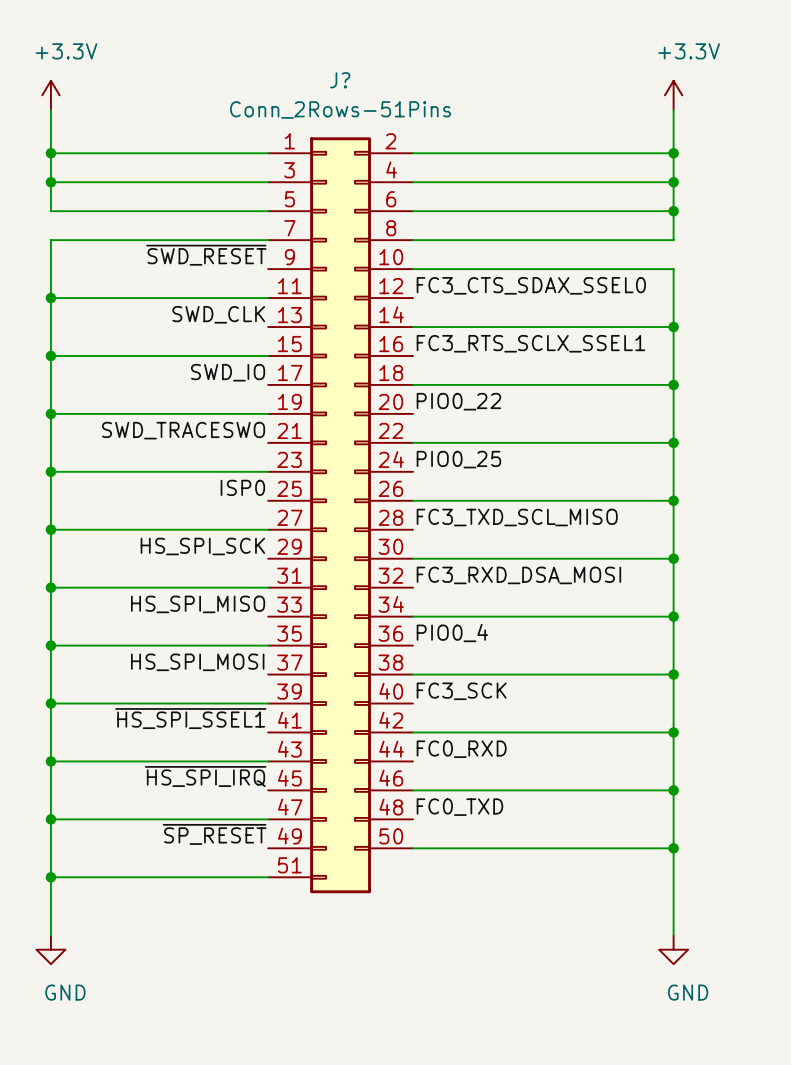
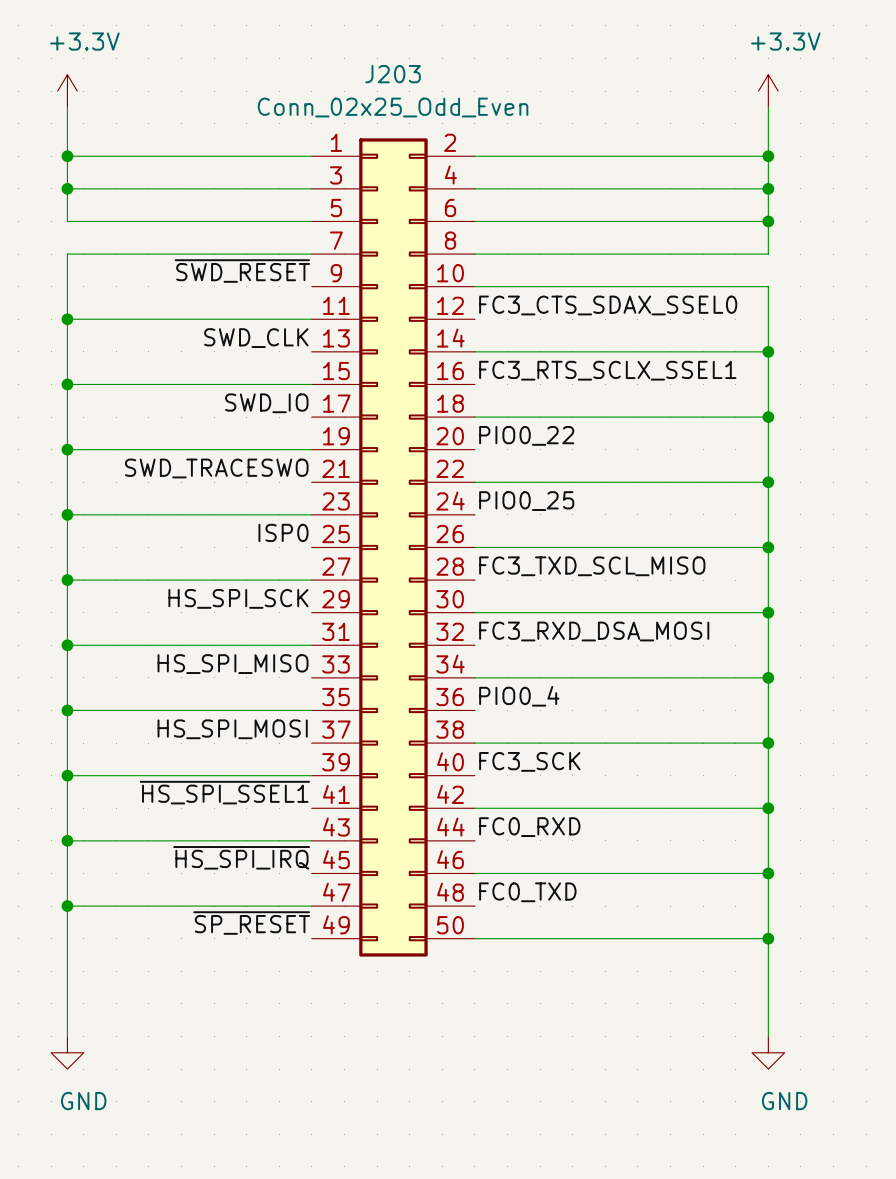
J203: none -> Conn_02x25_Odd_Even (393, 547)
J?: Conn_2Rows-51Pins (340, 515) -> none
wire: (50, 877) (268, 877) -> none
junction: (50, 877) -> none

